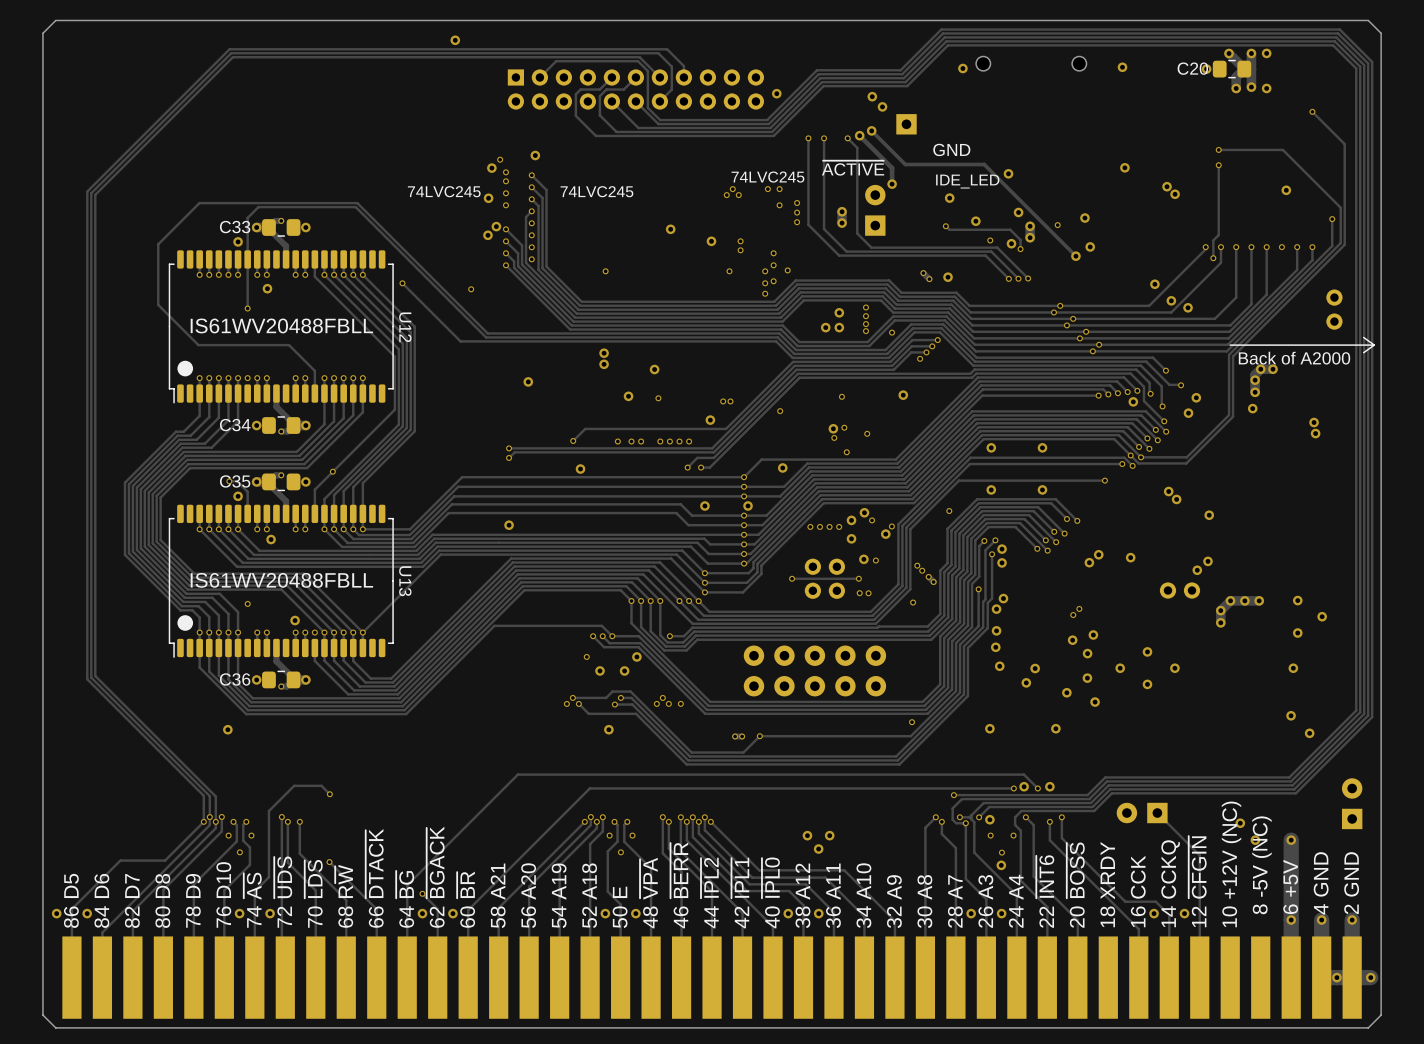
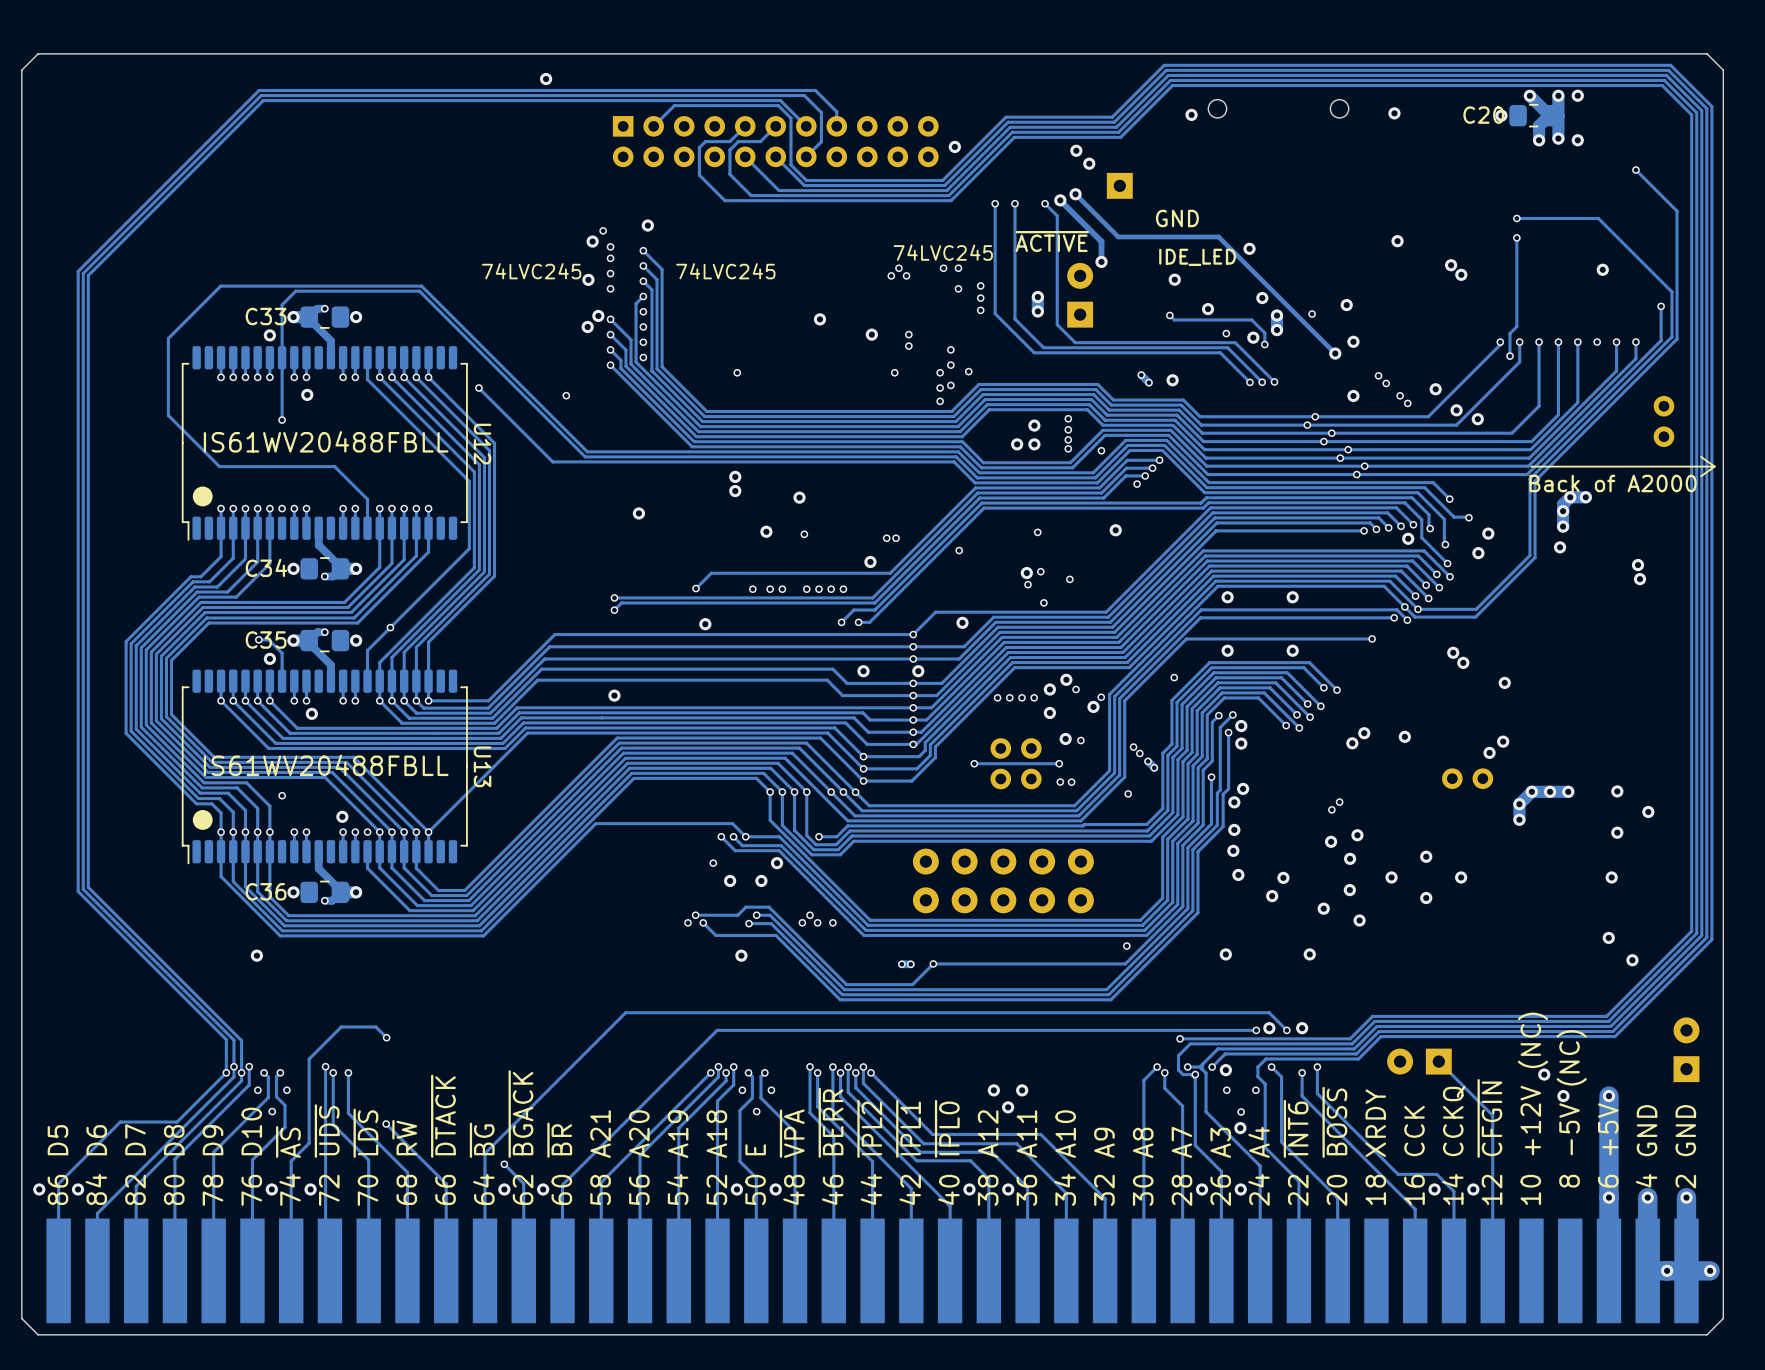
via: none -> (1378, 375)
via: none -> (1386, 383)
via: none -> (1353, 395)
via: none -> (1400, 395)
via: none -> (1407, 403)

